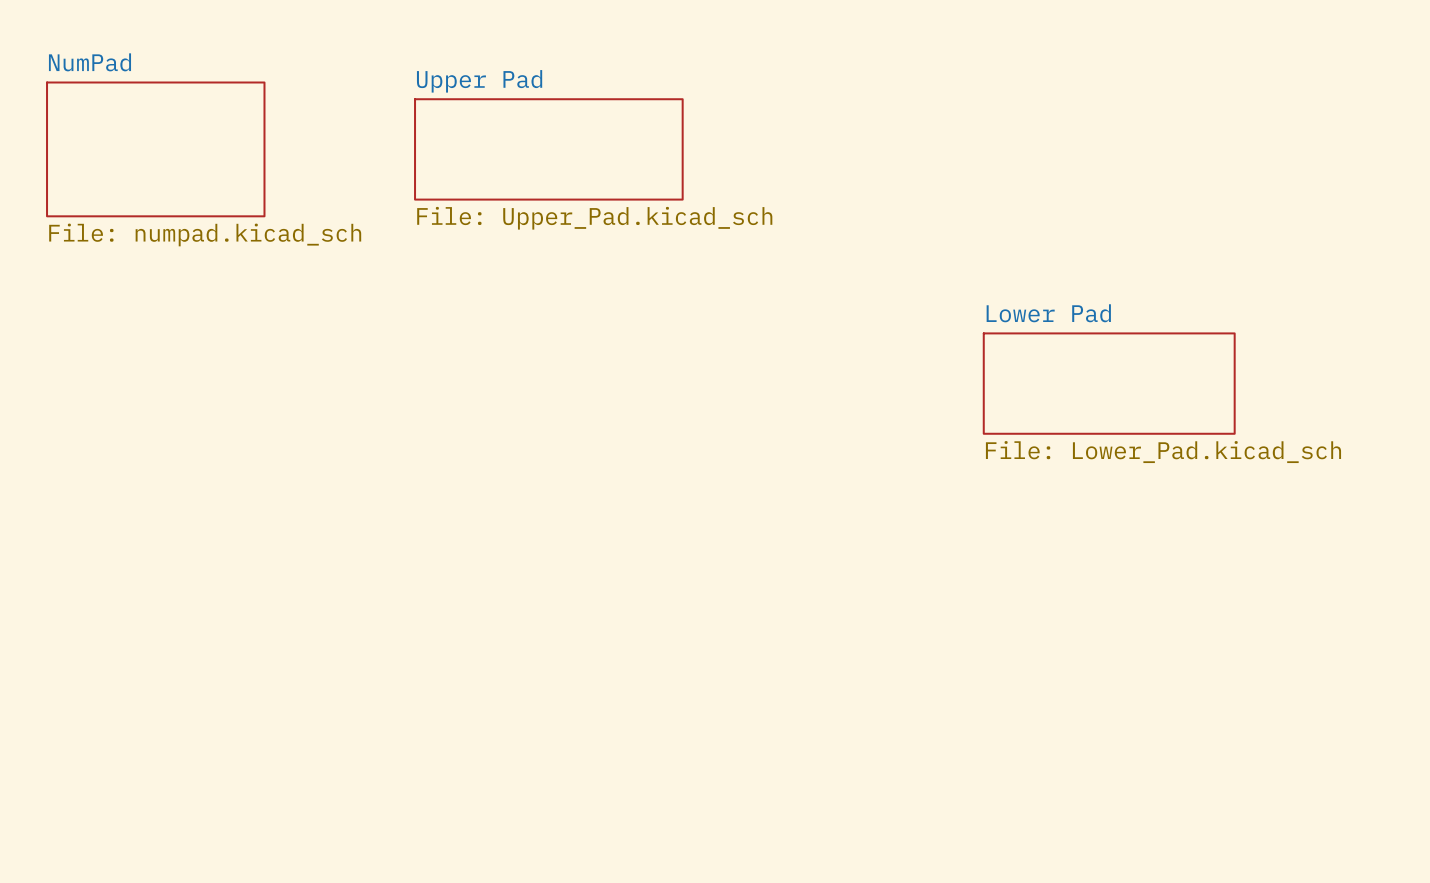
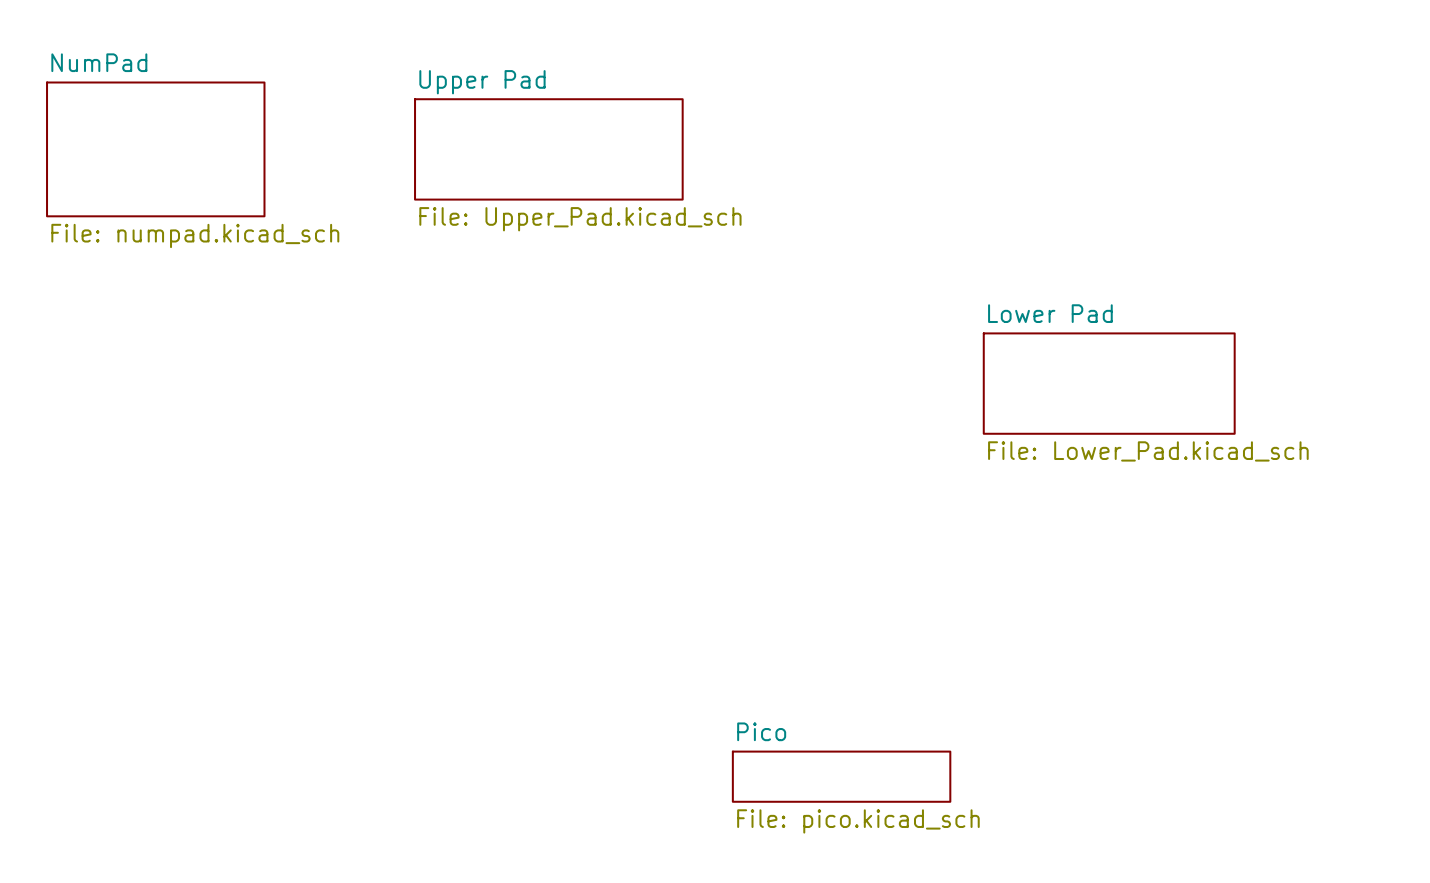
sheet Pico: none -> File: pico.kicad_sch (841, 776)

